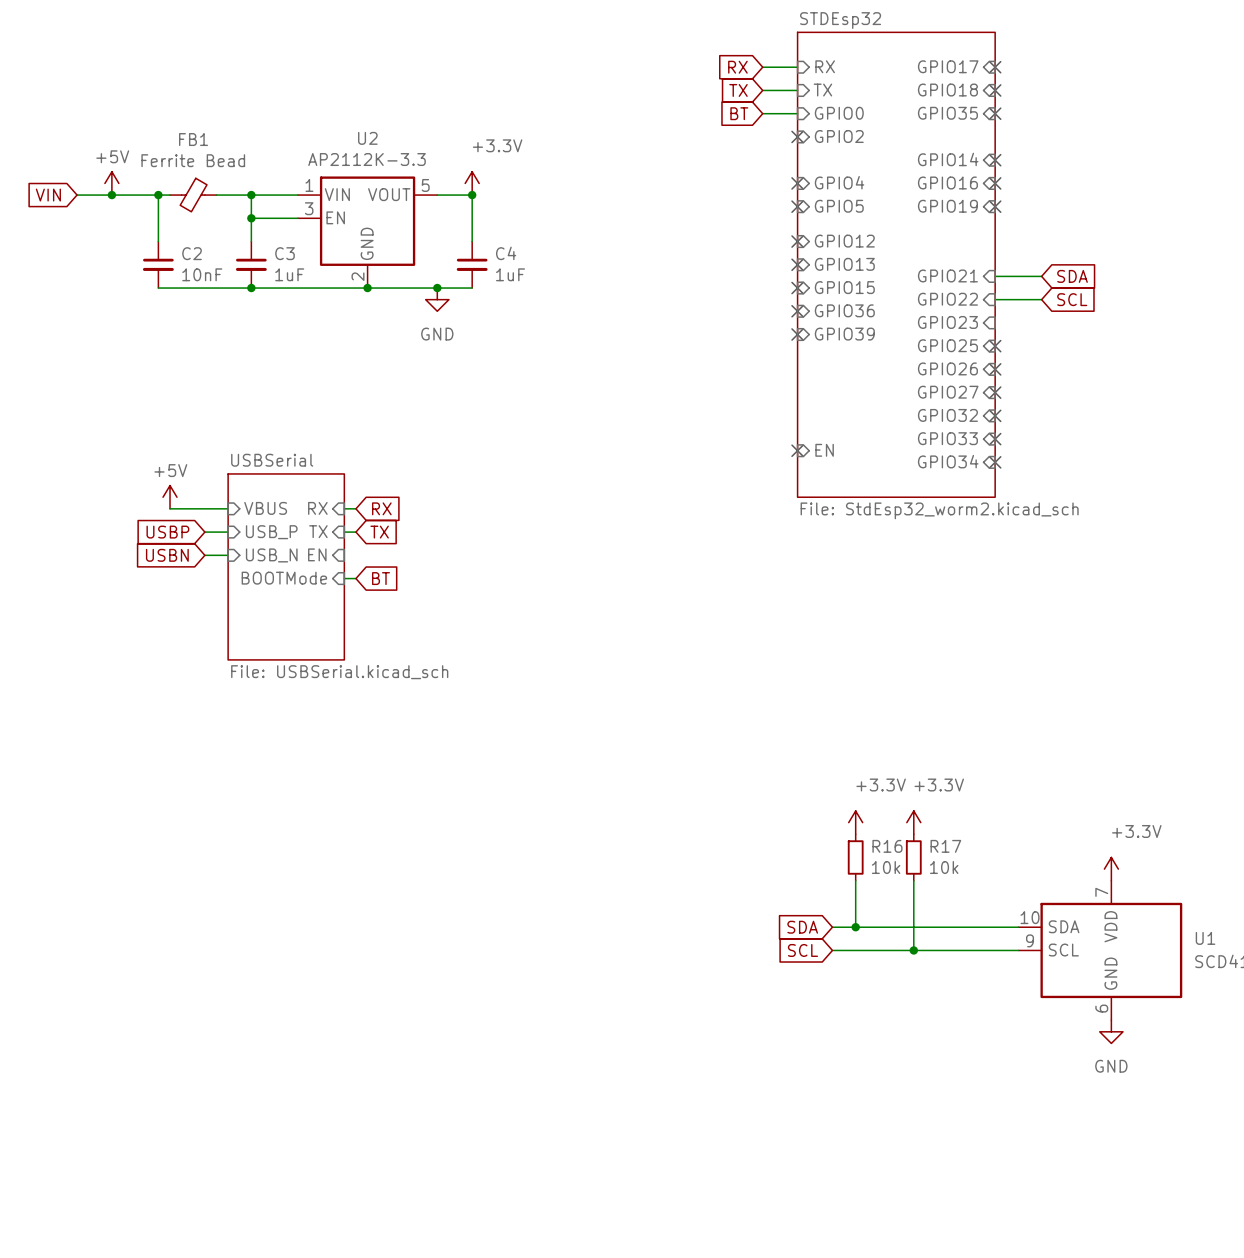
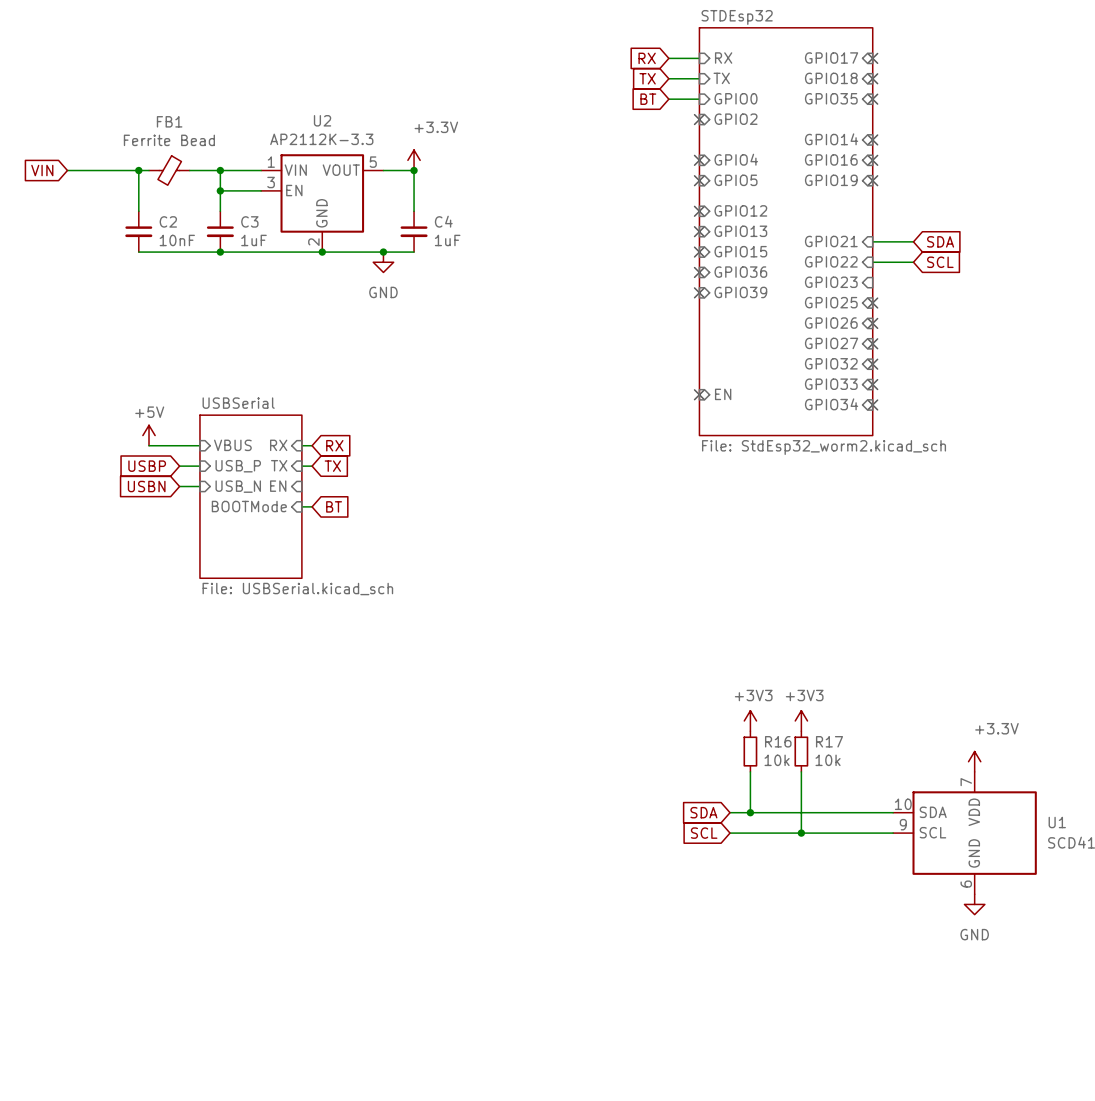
power symbol: +5V (111, 183) -> none
junction: (111, 195) -> none
power symbol: +3.3V (855, 822) -> +3V3 (750, 720)
power symbol: +3.3V (913, 822) -> +3V3 (801, 720)

